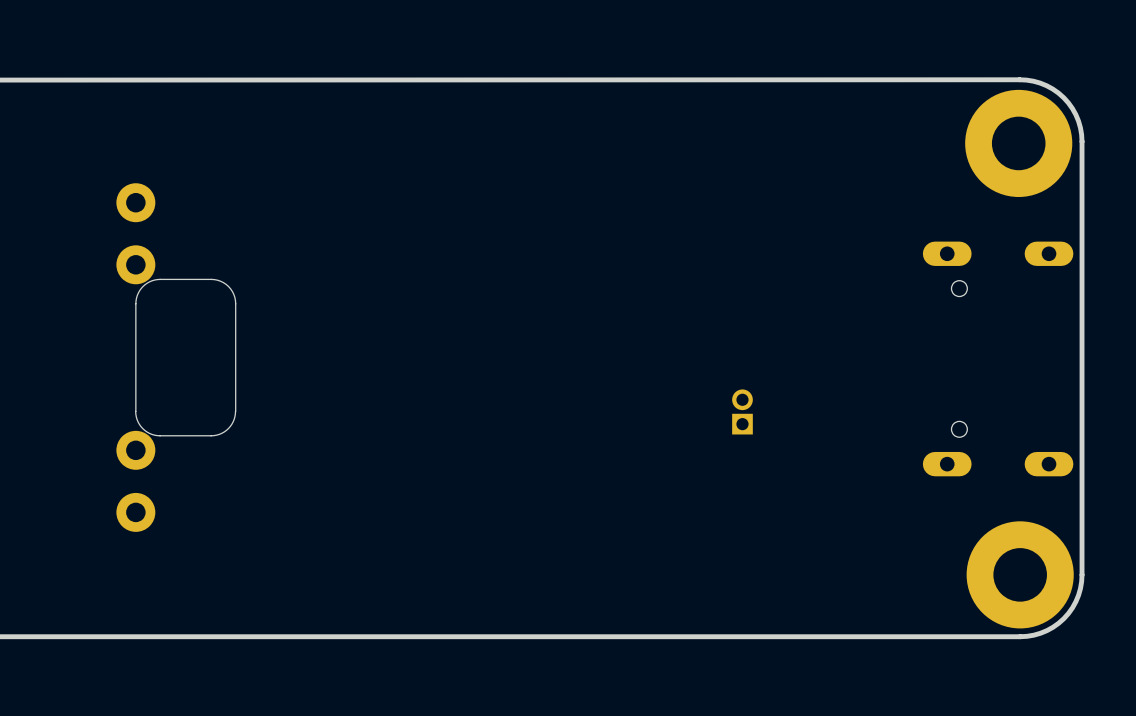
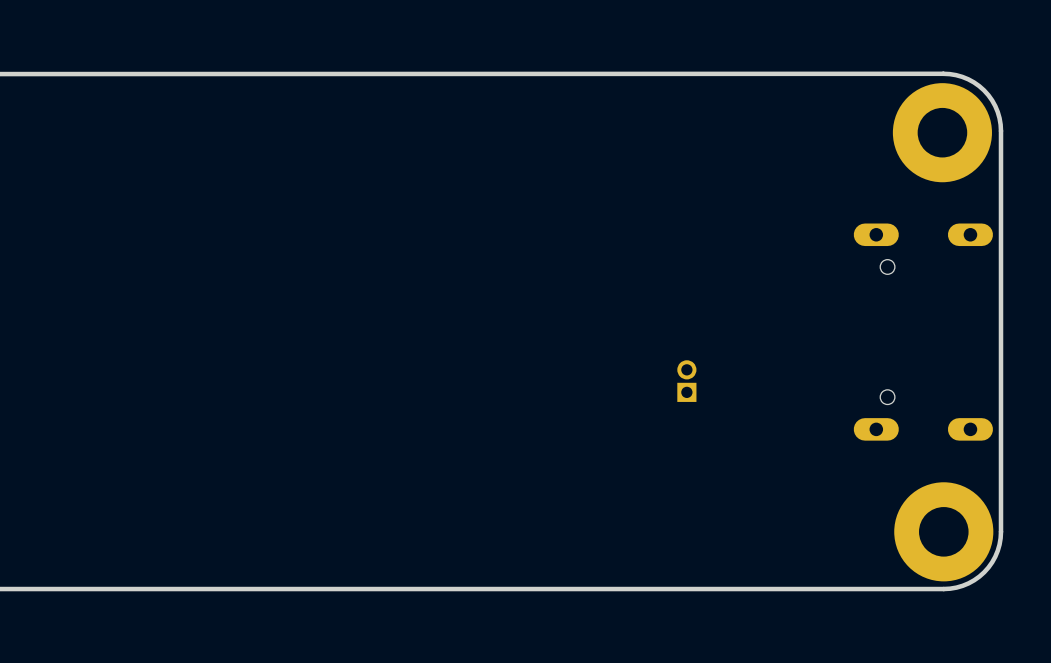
part: (176, 357) -> none

